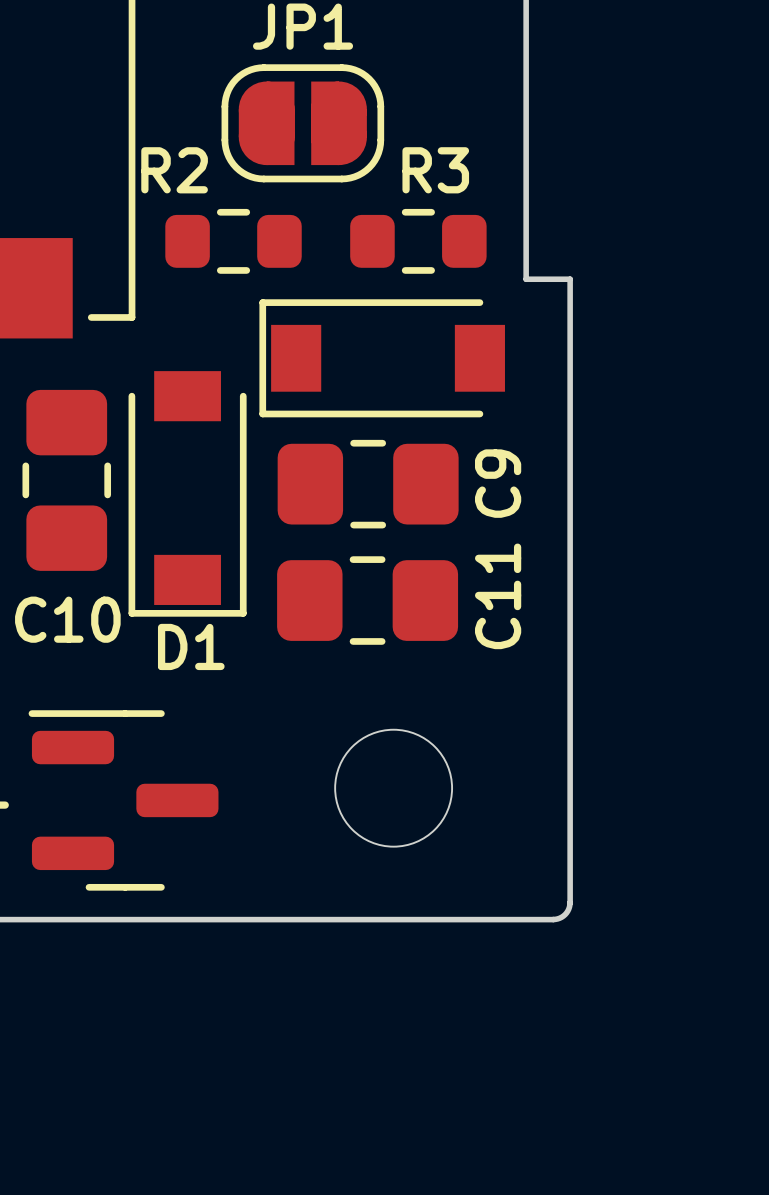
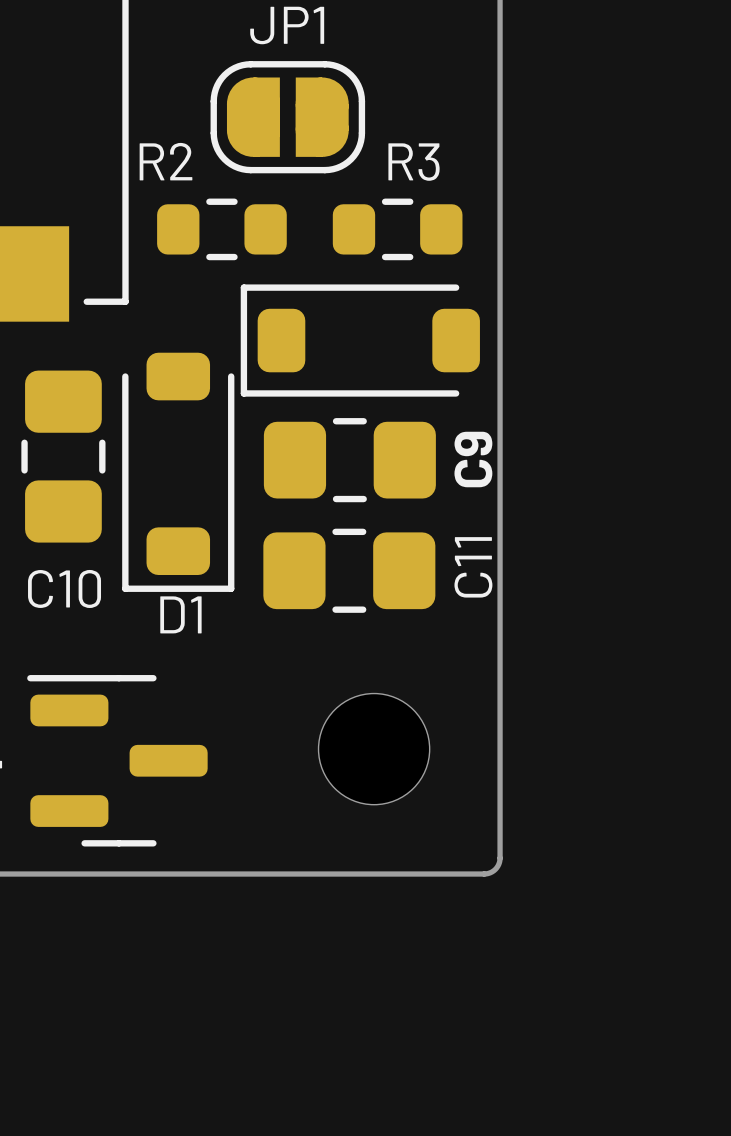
board edge: (526, 279) (570, 279) (570, 902) (566, 912) (557, 918) (509, 919) -> (500, 265) (500, 858) (495, 869) (484, 874)
part footprint: [259, 299, 505, 418] -> [240, 284, 480, 397]
D1 footprint: [128, 371, 247, 617] -> [122, 352, 235, 592]

